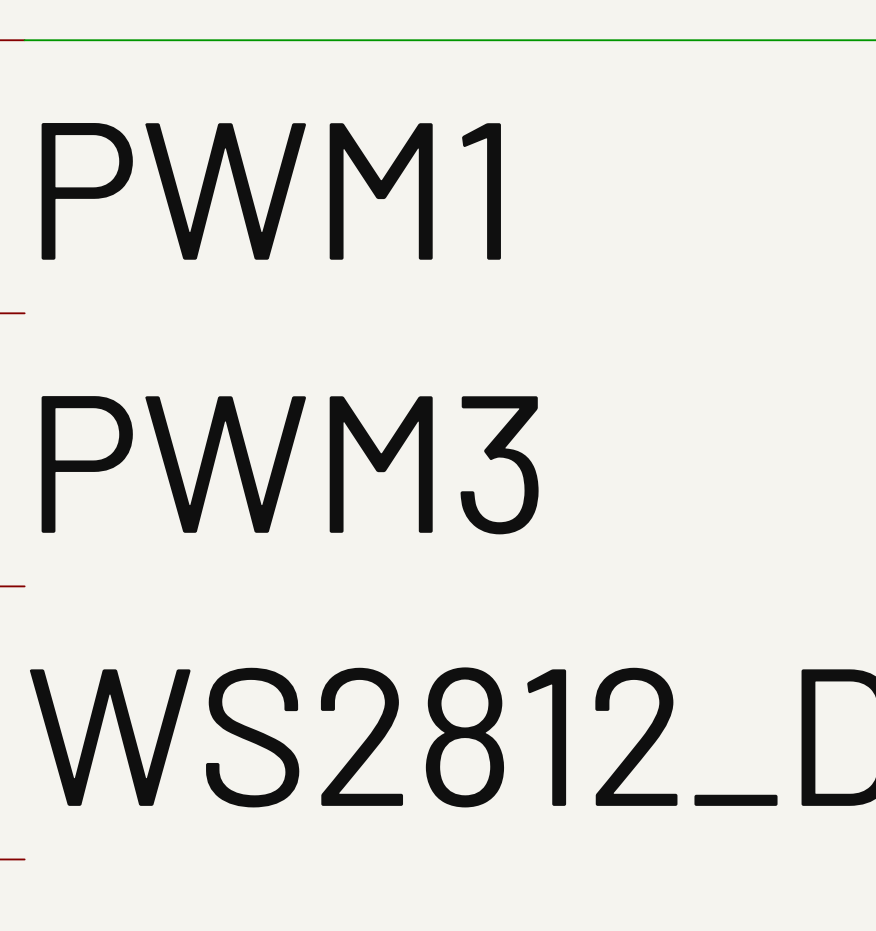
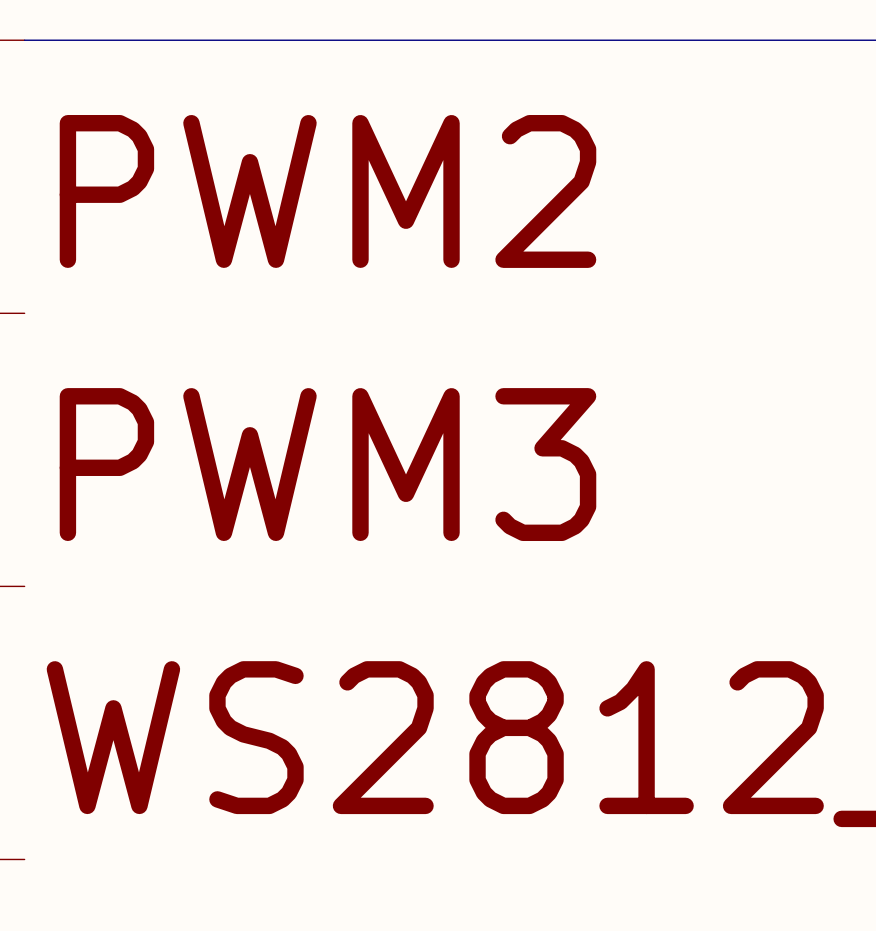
label: PWM1 (271, 191) -> PWM2 (327, 191)

